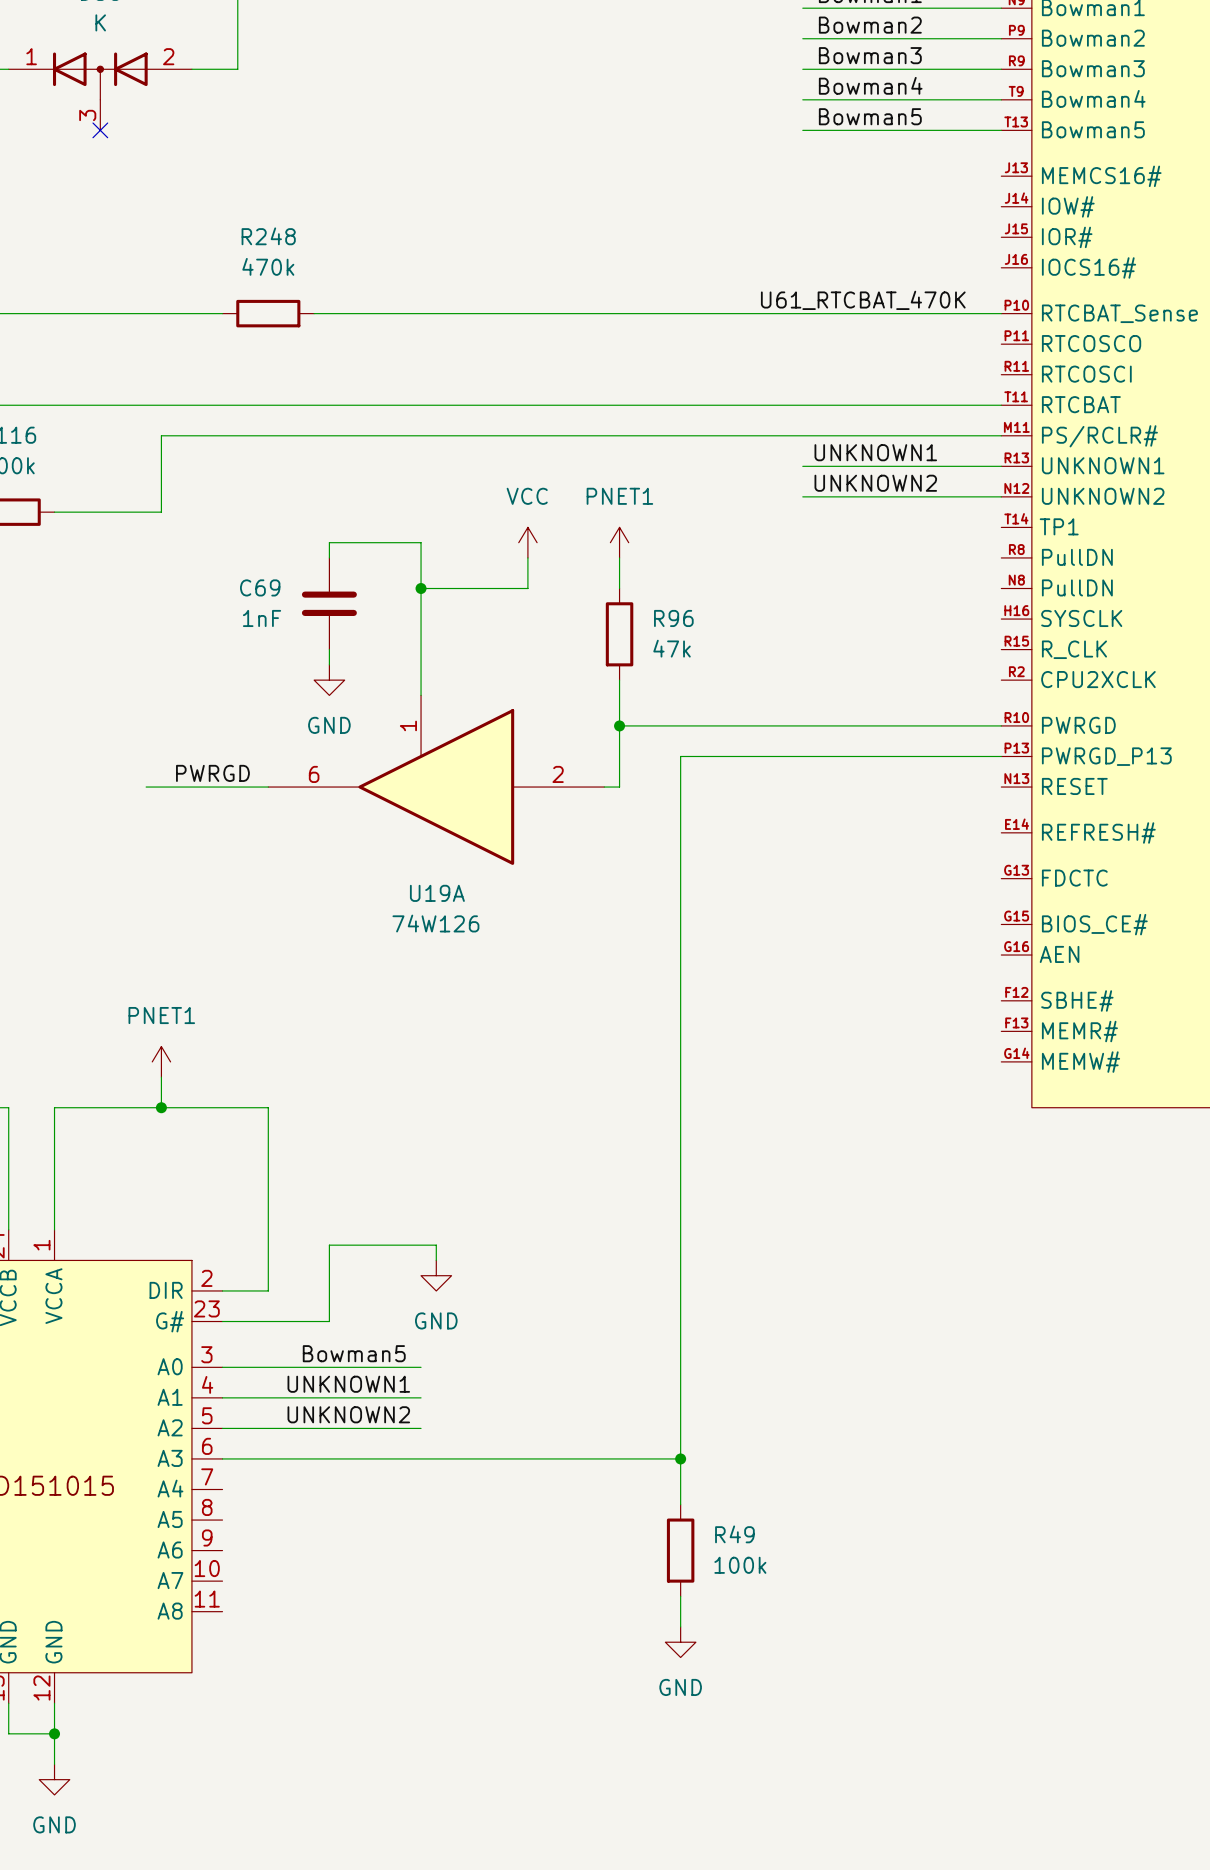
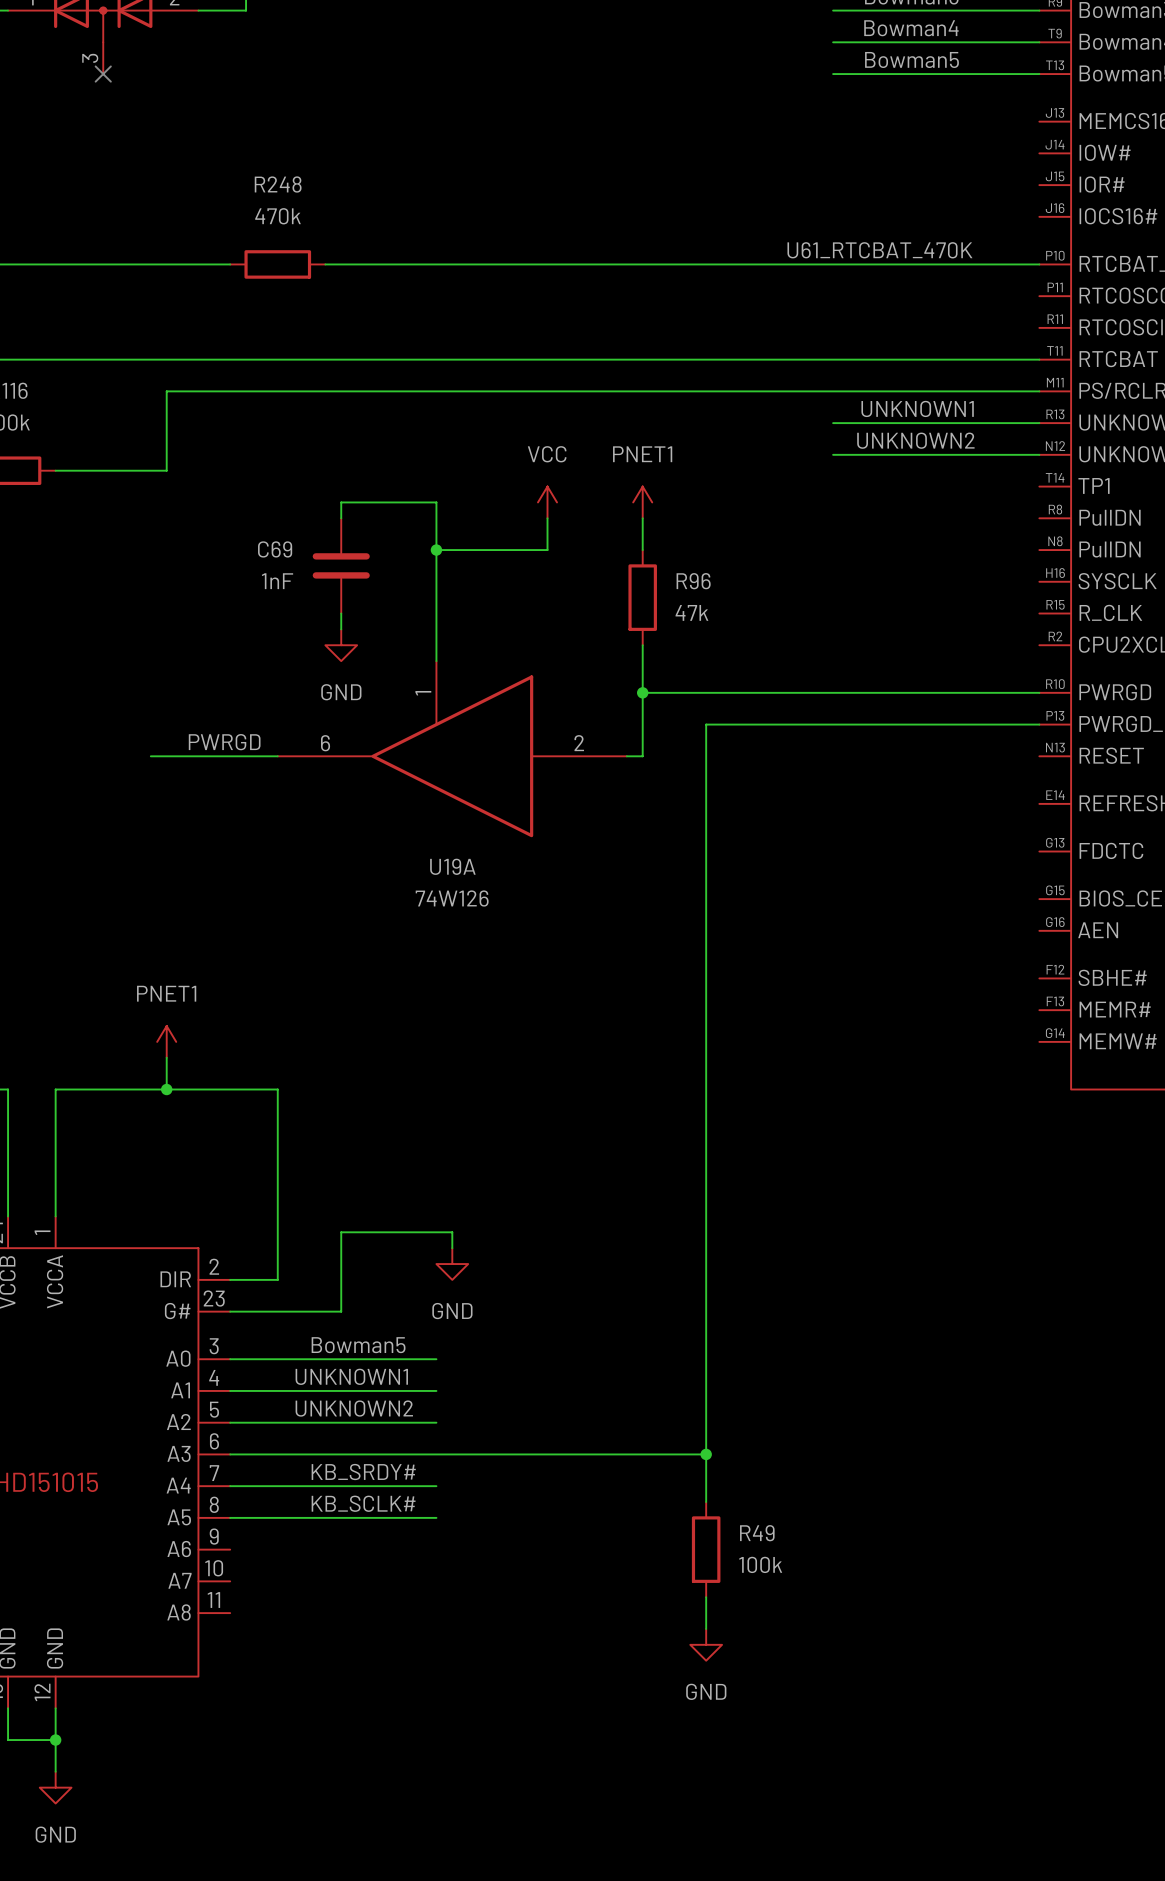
label: none -> KB_SRDY# (363, 1472)
wire: none -> (230, 1486) (436, 1486)
label: none -> KB_SCLK# (363, 1503)
wire: none -> (230, 1517) (436, 1517)

